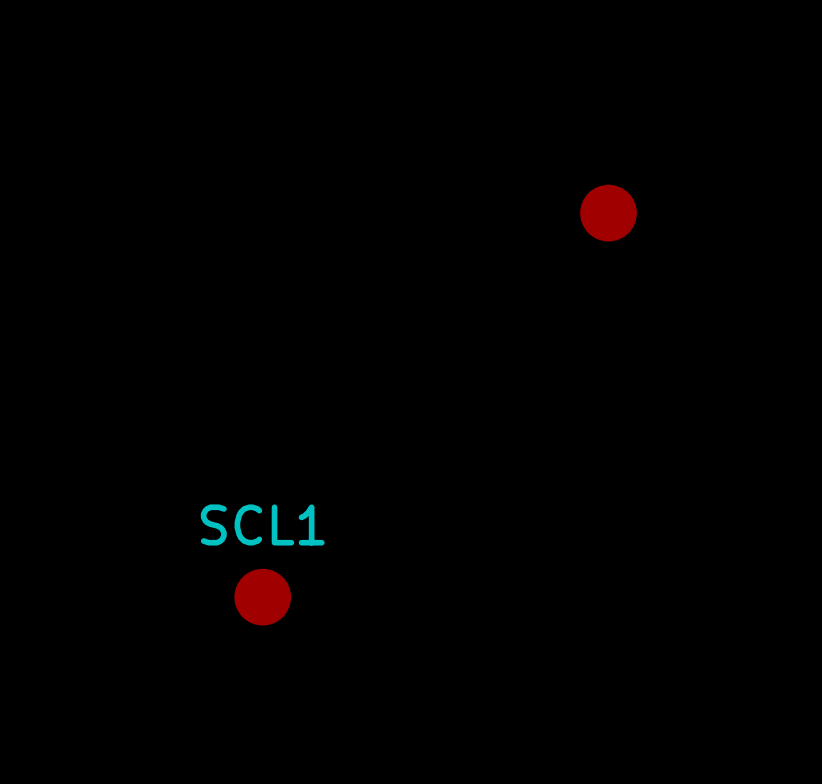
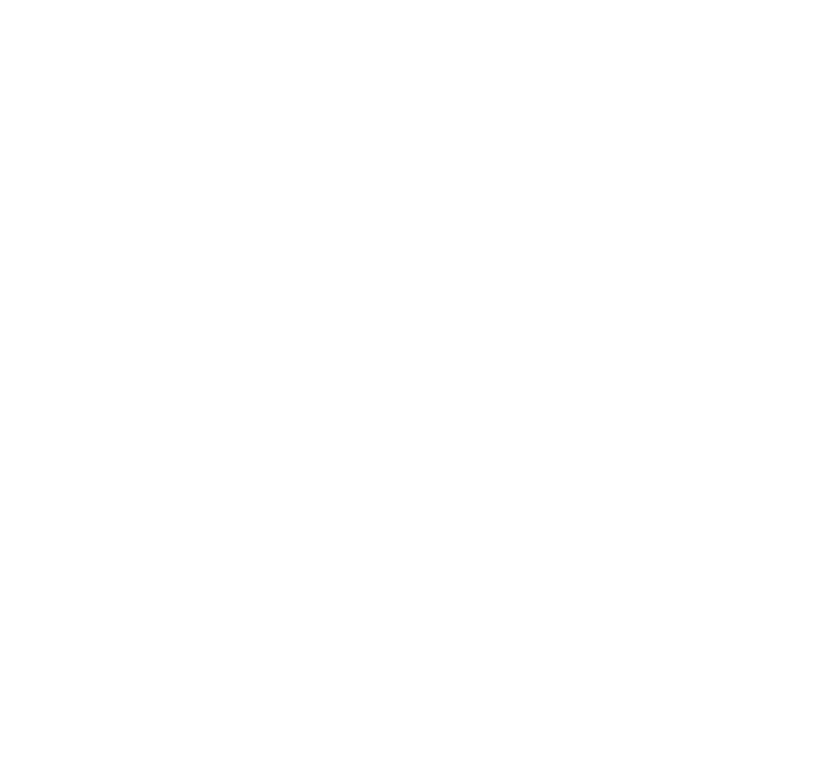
part: (608, 213) -> none
part: SCL1 (262, 597) -> none

